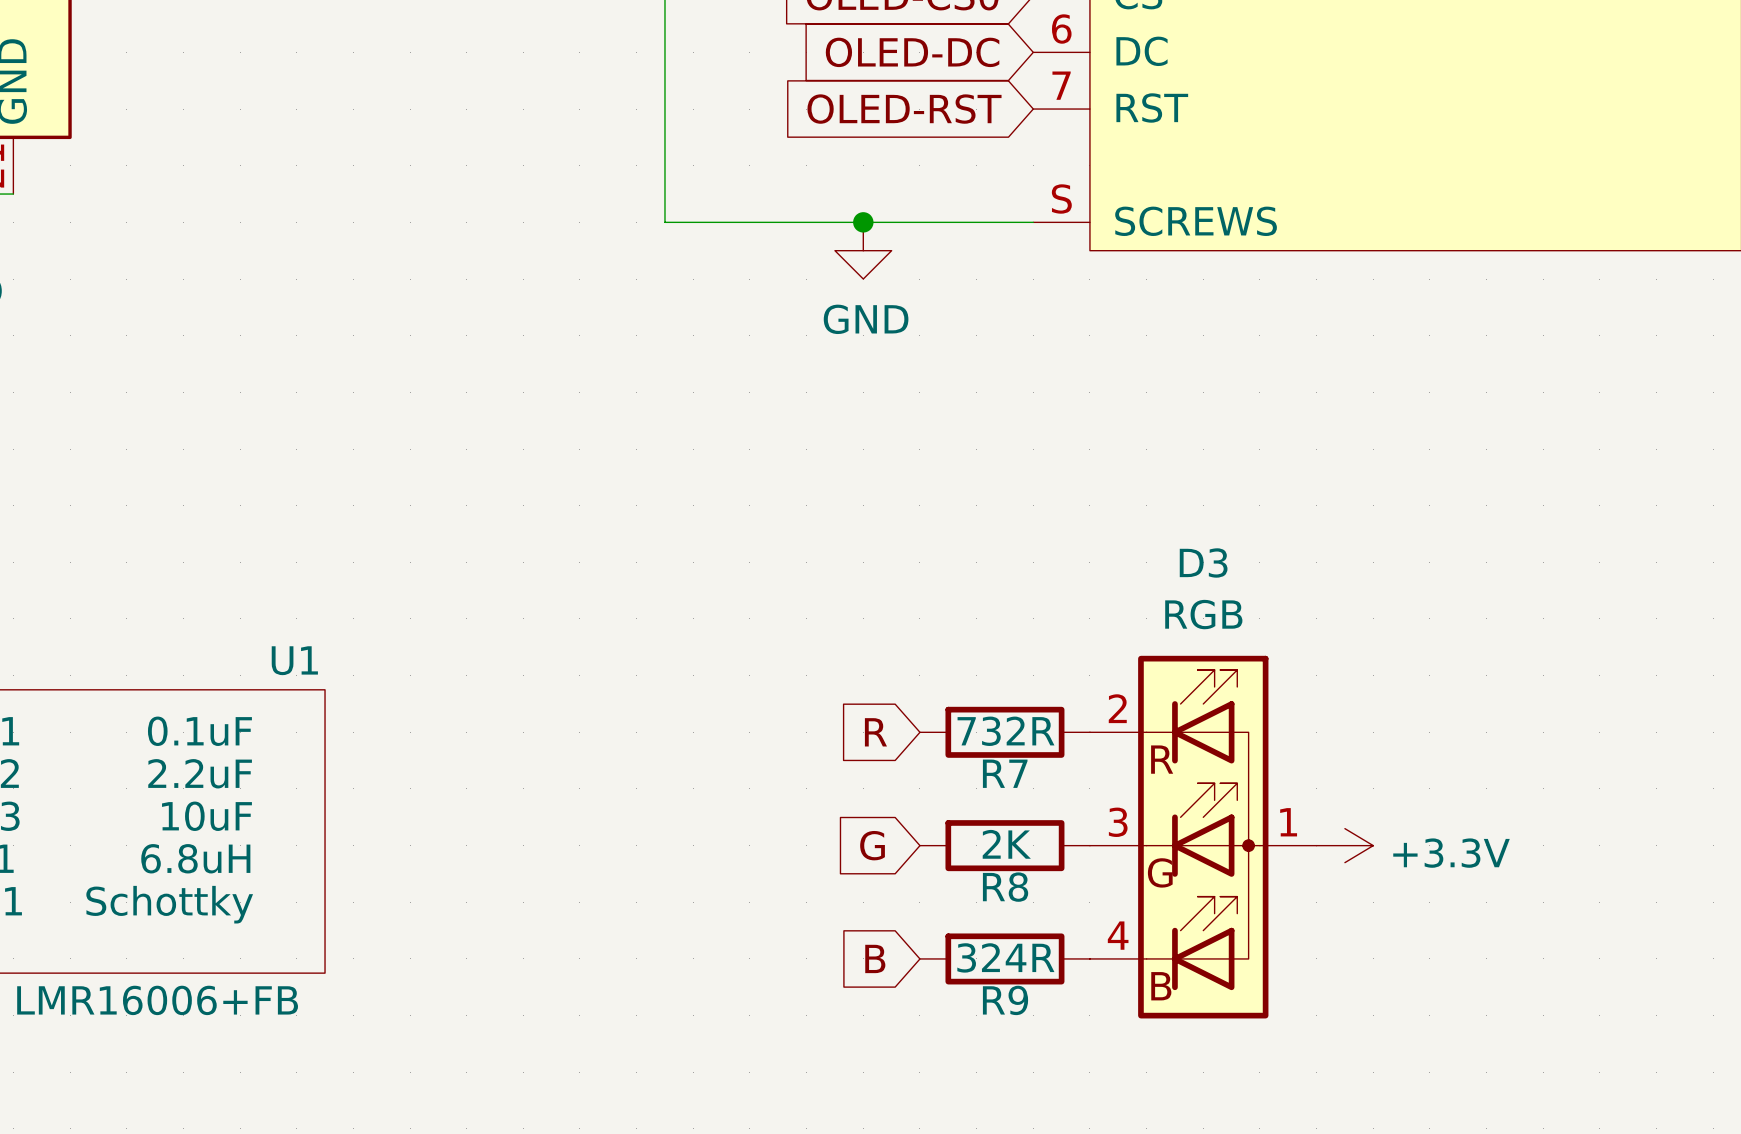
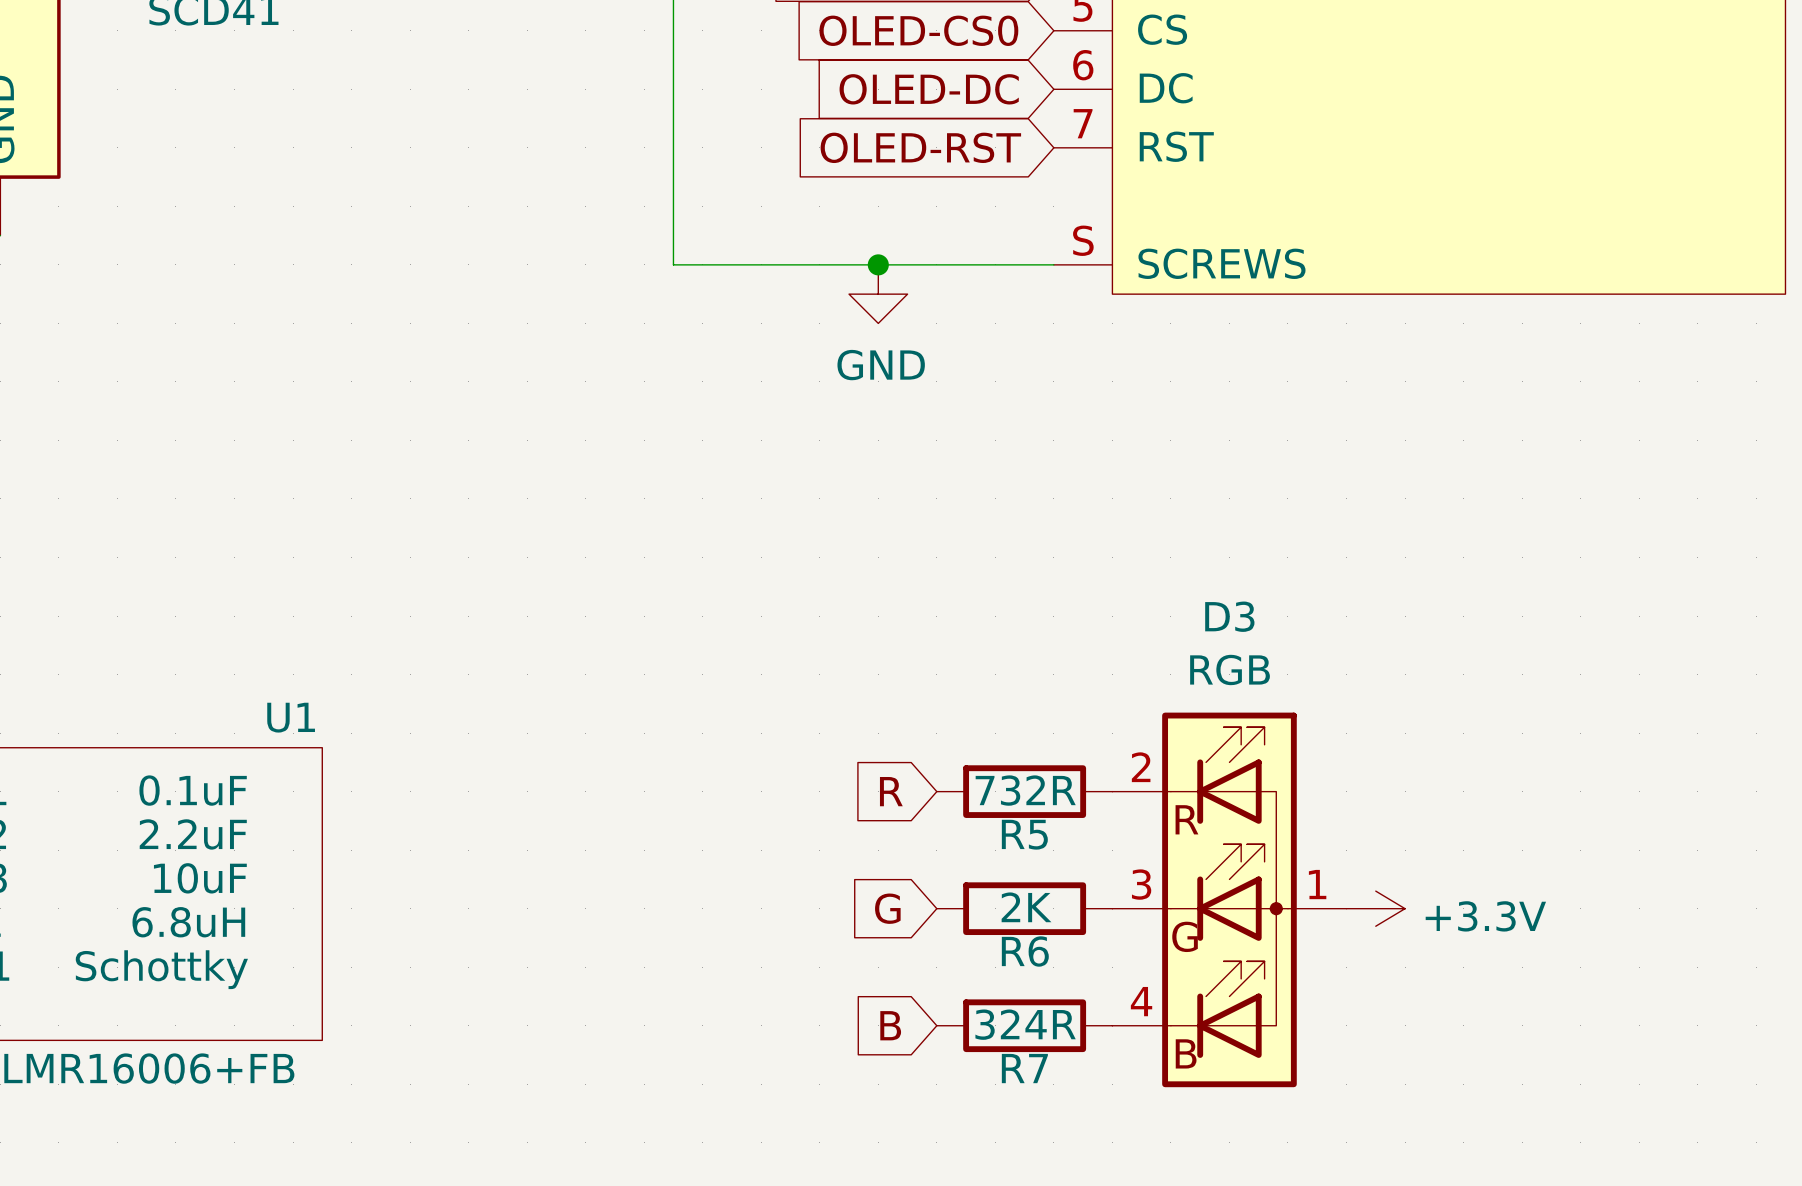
R7 name: R7 (1005, 773) -> R5 (1024, 834)
R8 name: R8 (1005, 887) -> R6 (1025, 951)
R9 name: R9 (1005, 1000) -> R7 (1024, 1068)

